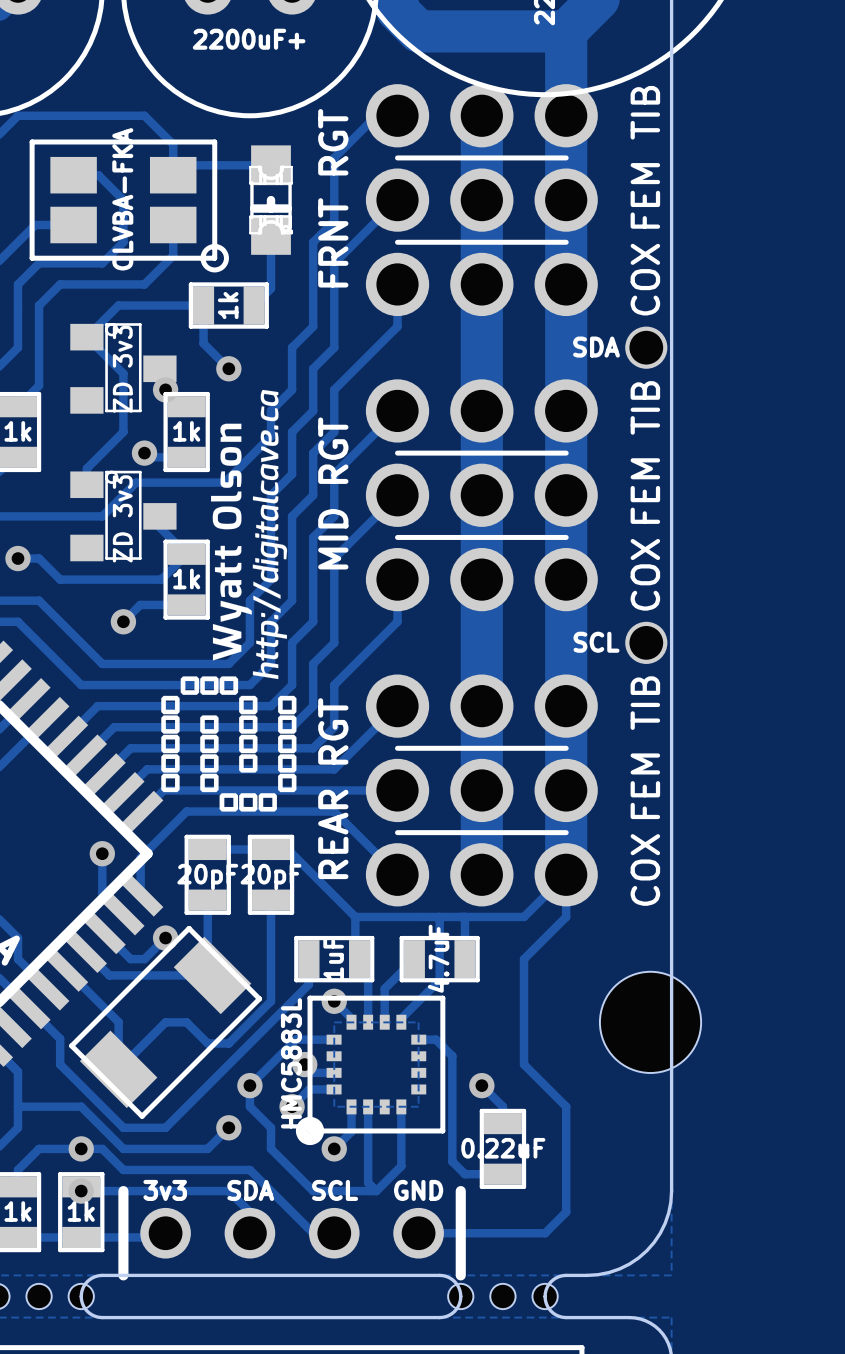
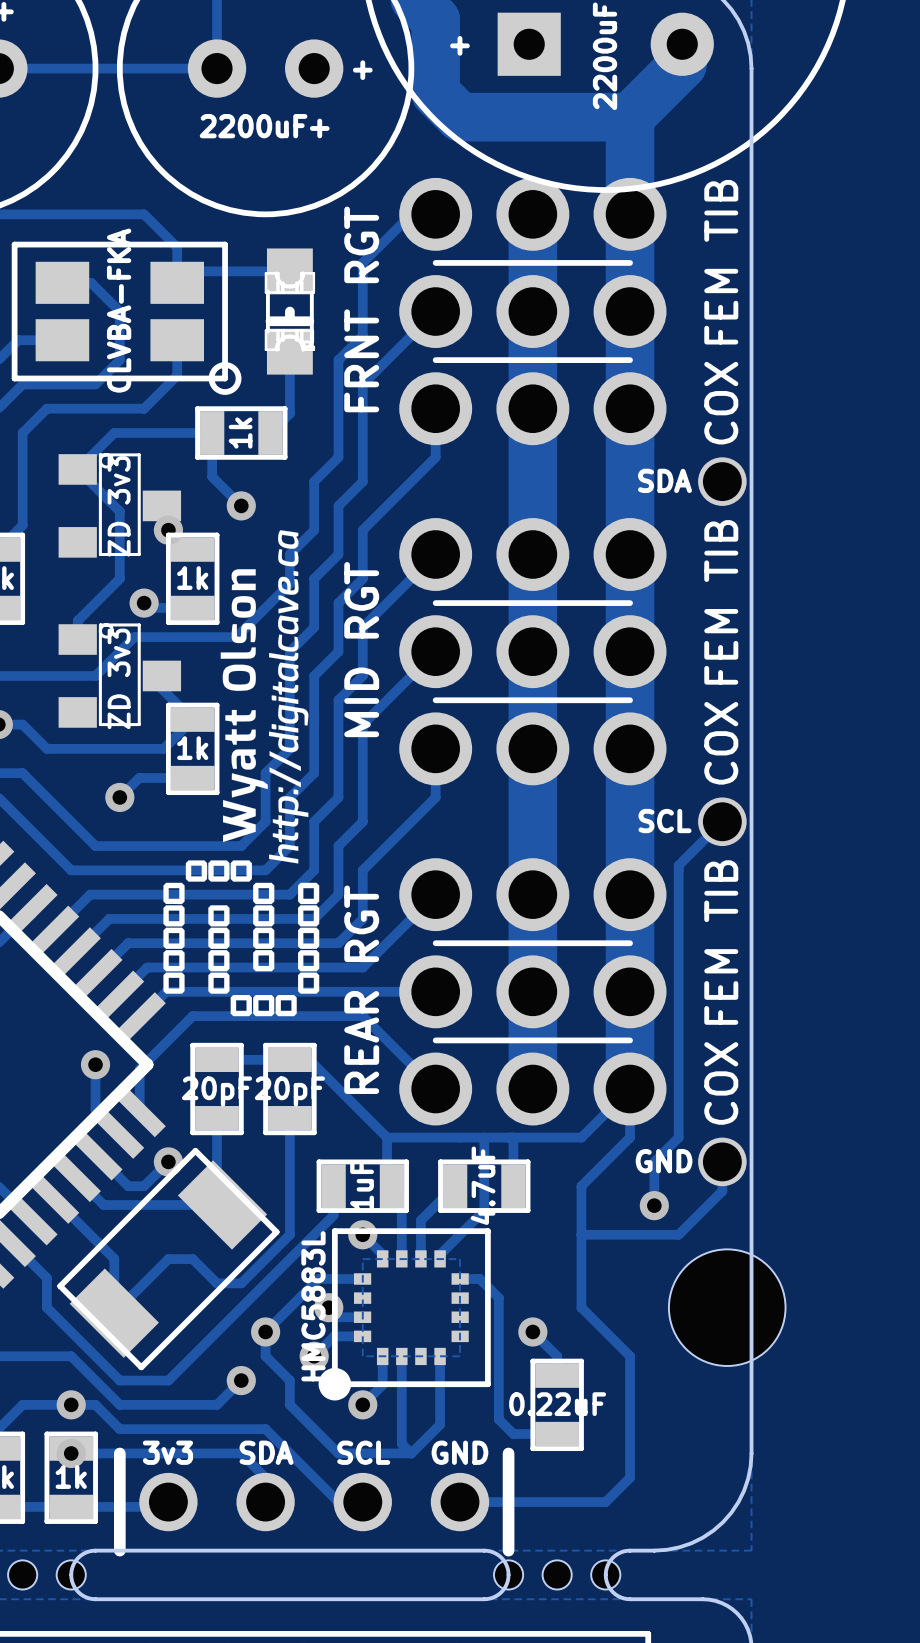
track: none -> (722, 821) (678, 865) (678, 1137) (654, 1161) (654, 1205)
text: none -> GND (664, 1161)
track: none -> (722, 1161) (722, 1191) (678, 1234) (581, 1234)
part: none -> (722, 1161)
via: none -> (654, 1205)
part position: (650, 1022) -> (727, 1307)

